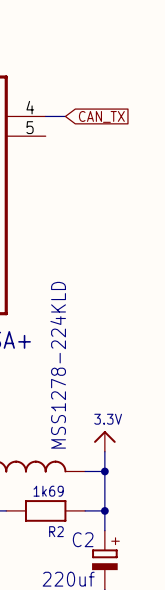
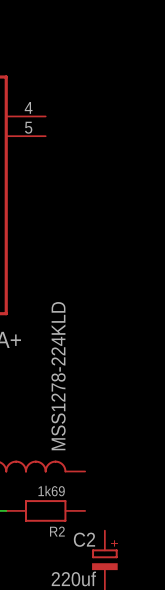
wire: (45, 116) (65, 116) -> none
global label: CAN_TX (101, 116) -> none
power symbol: 3.3V (104, 441) -> none
wire: (104, 451) (104, 530) -> none
wire: (85, 471) (104, 471) -> none
junction: (104, 471) -> none
wire: (85, 510) (104, 510) -> none
junction: (104, 510) -> none

